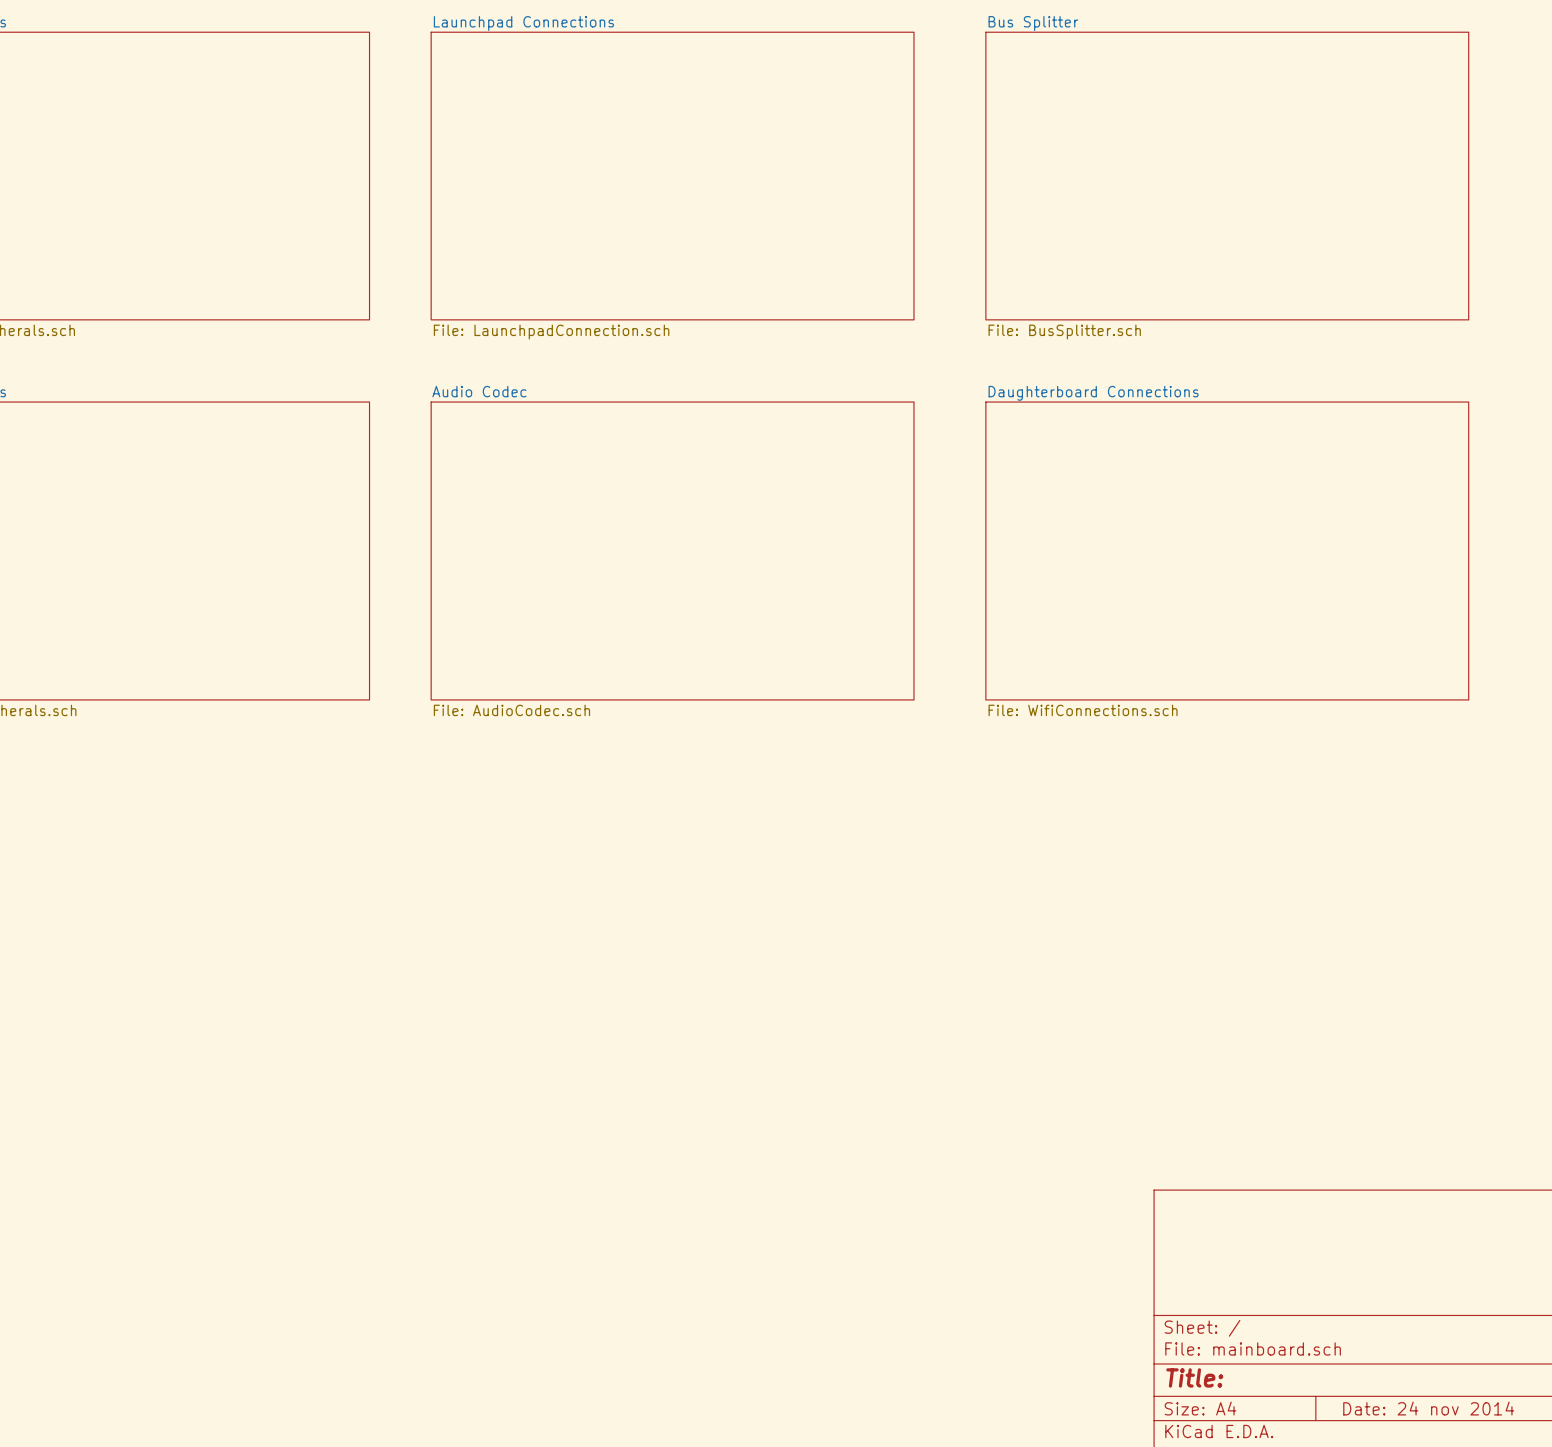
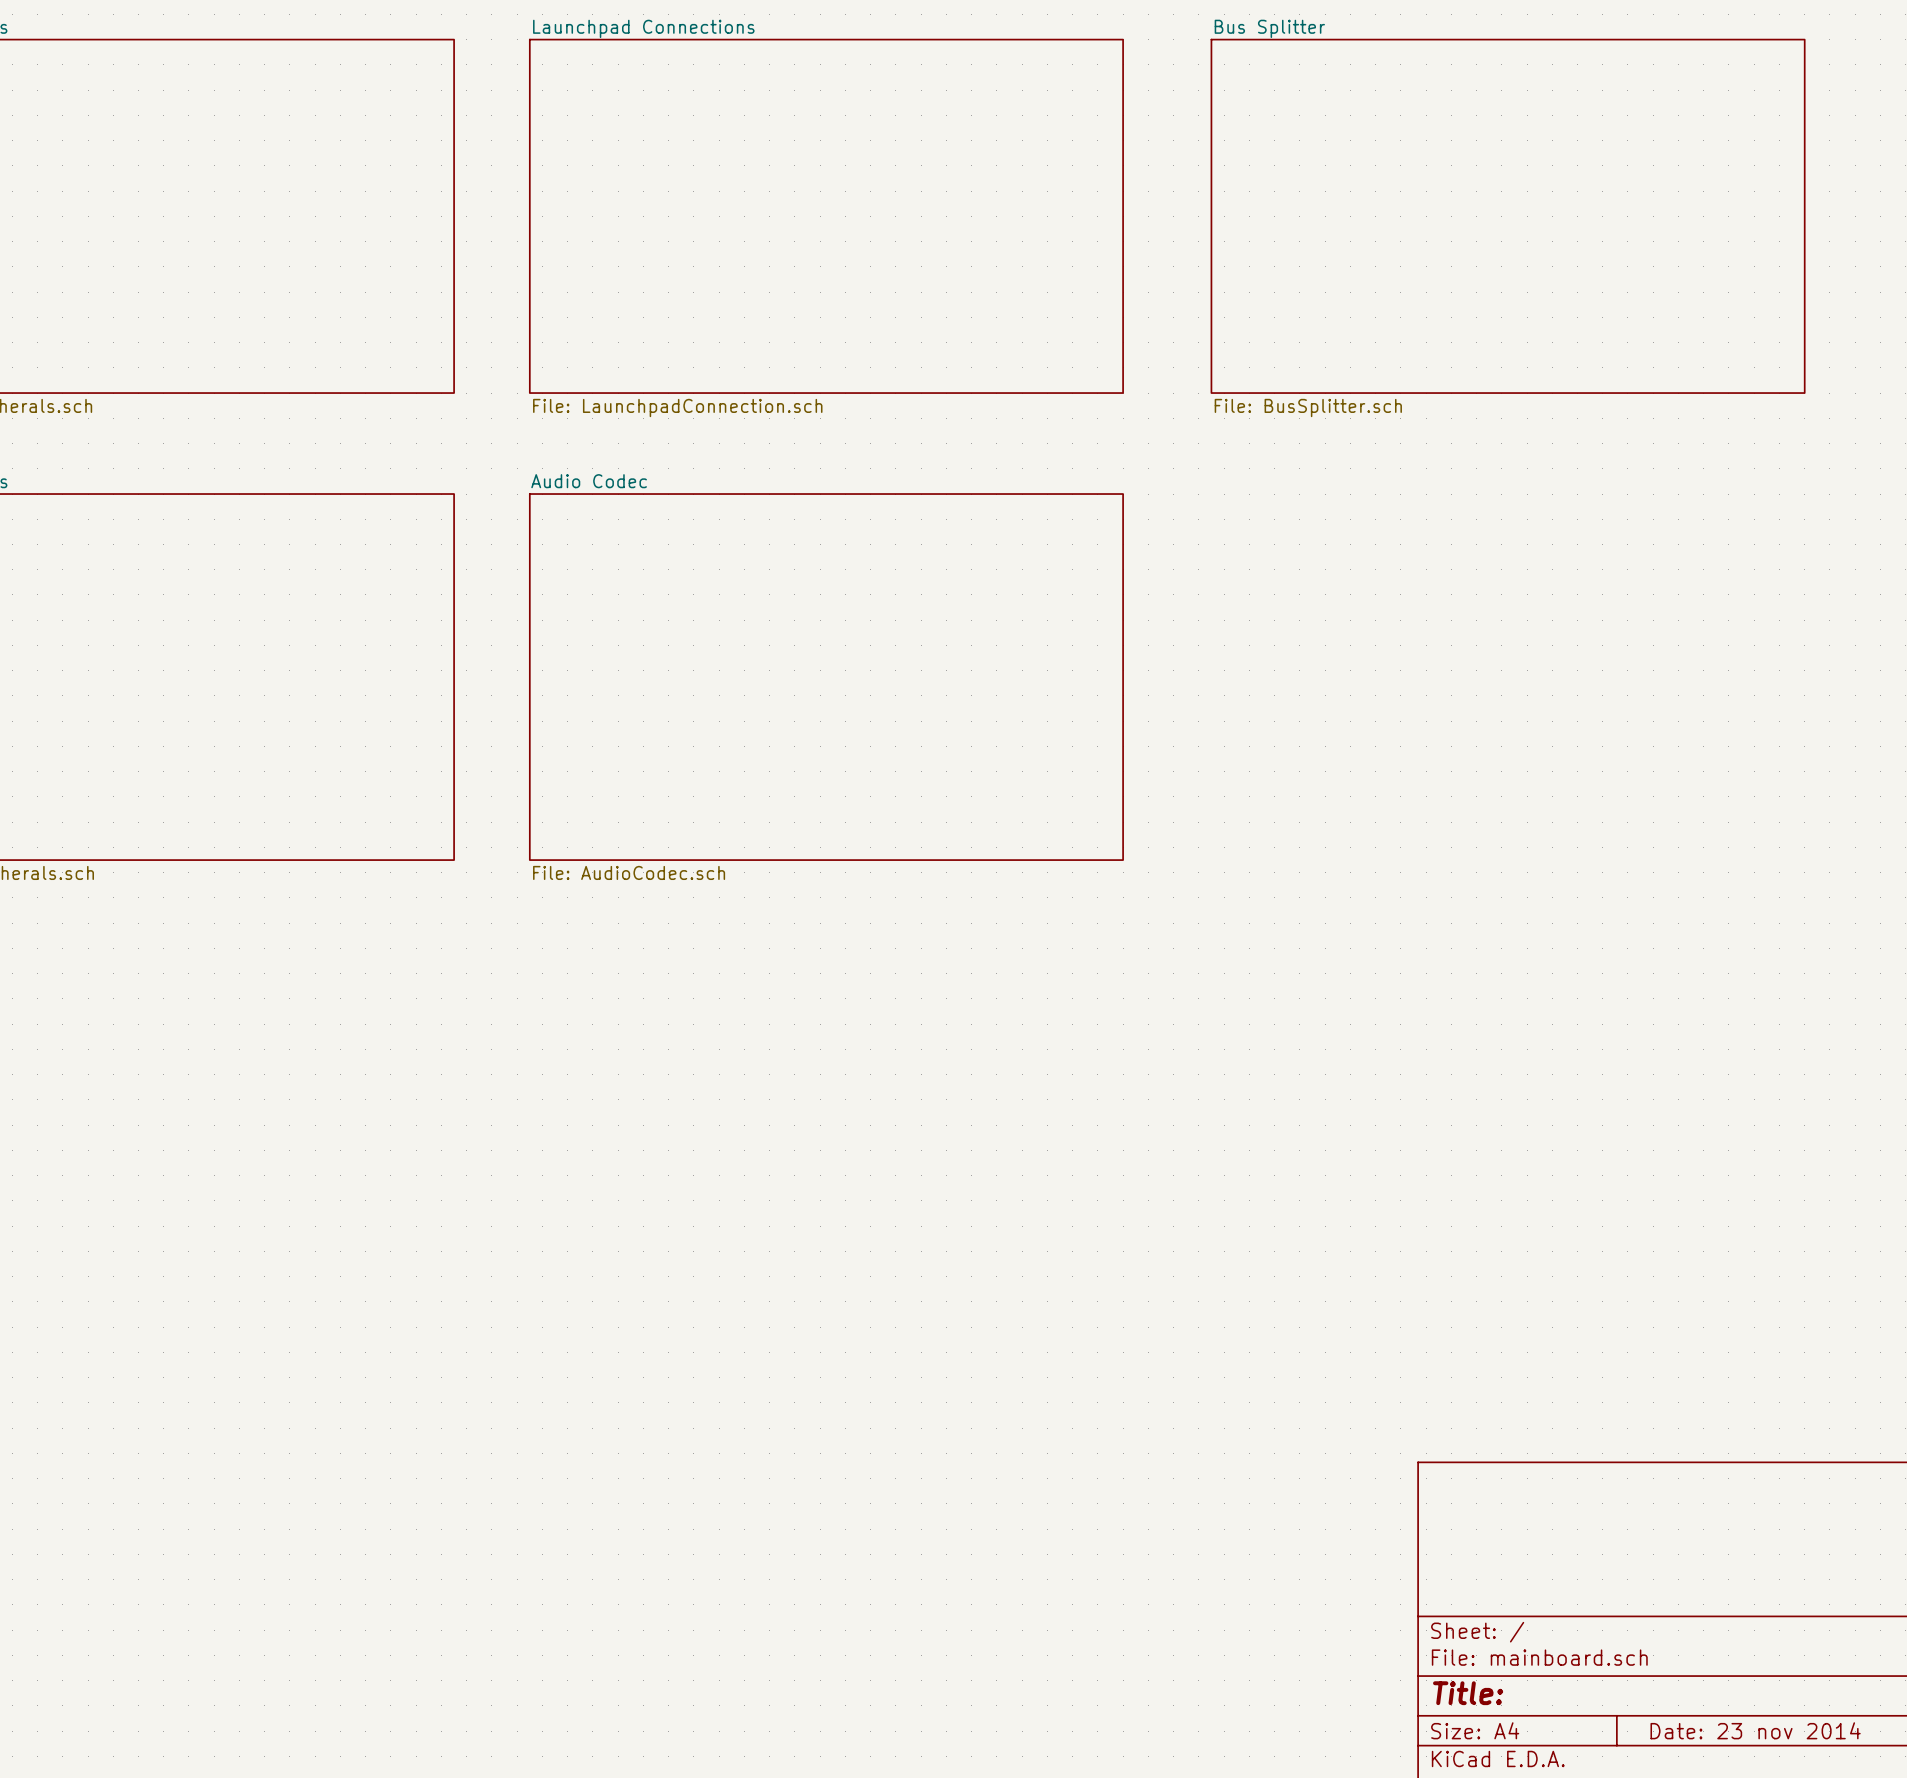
sheet Daughterboard Connections: File: WifiConnections.sch (1227, 550) -> none
title block: Date: 24 nov 2014 (1428, 1408) -> Date: 23 nov 2014 (1755, 1730)

